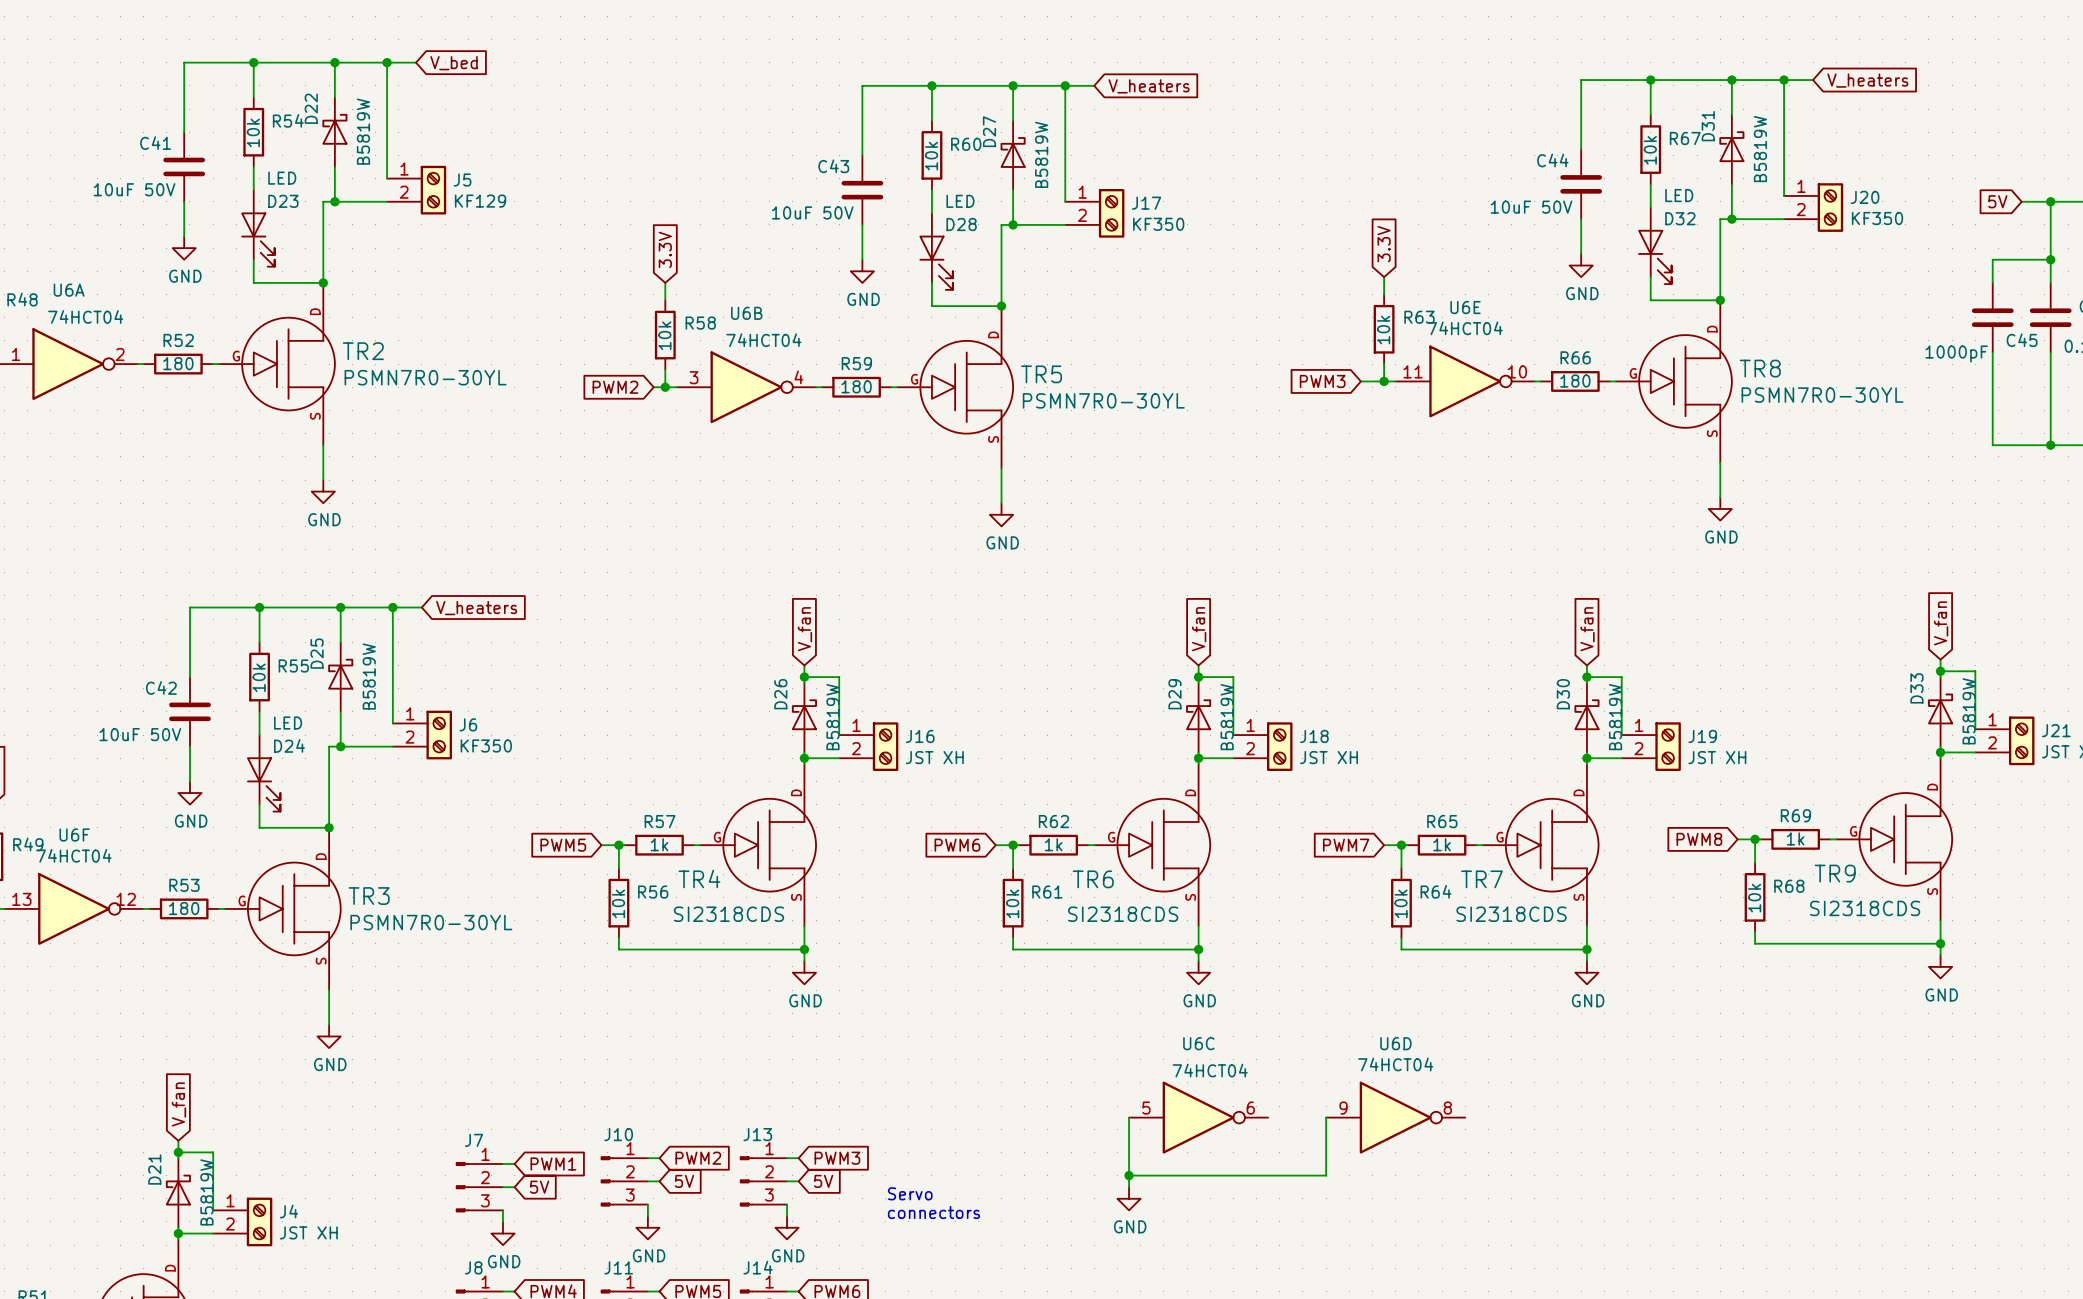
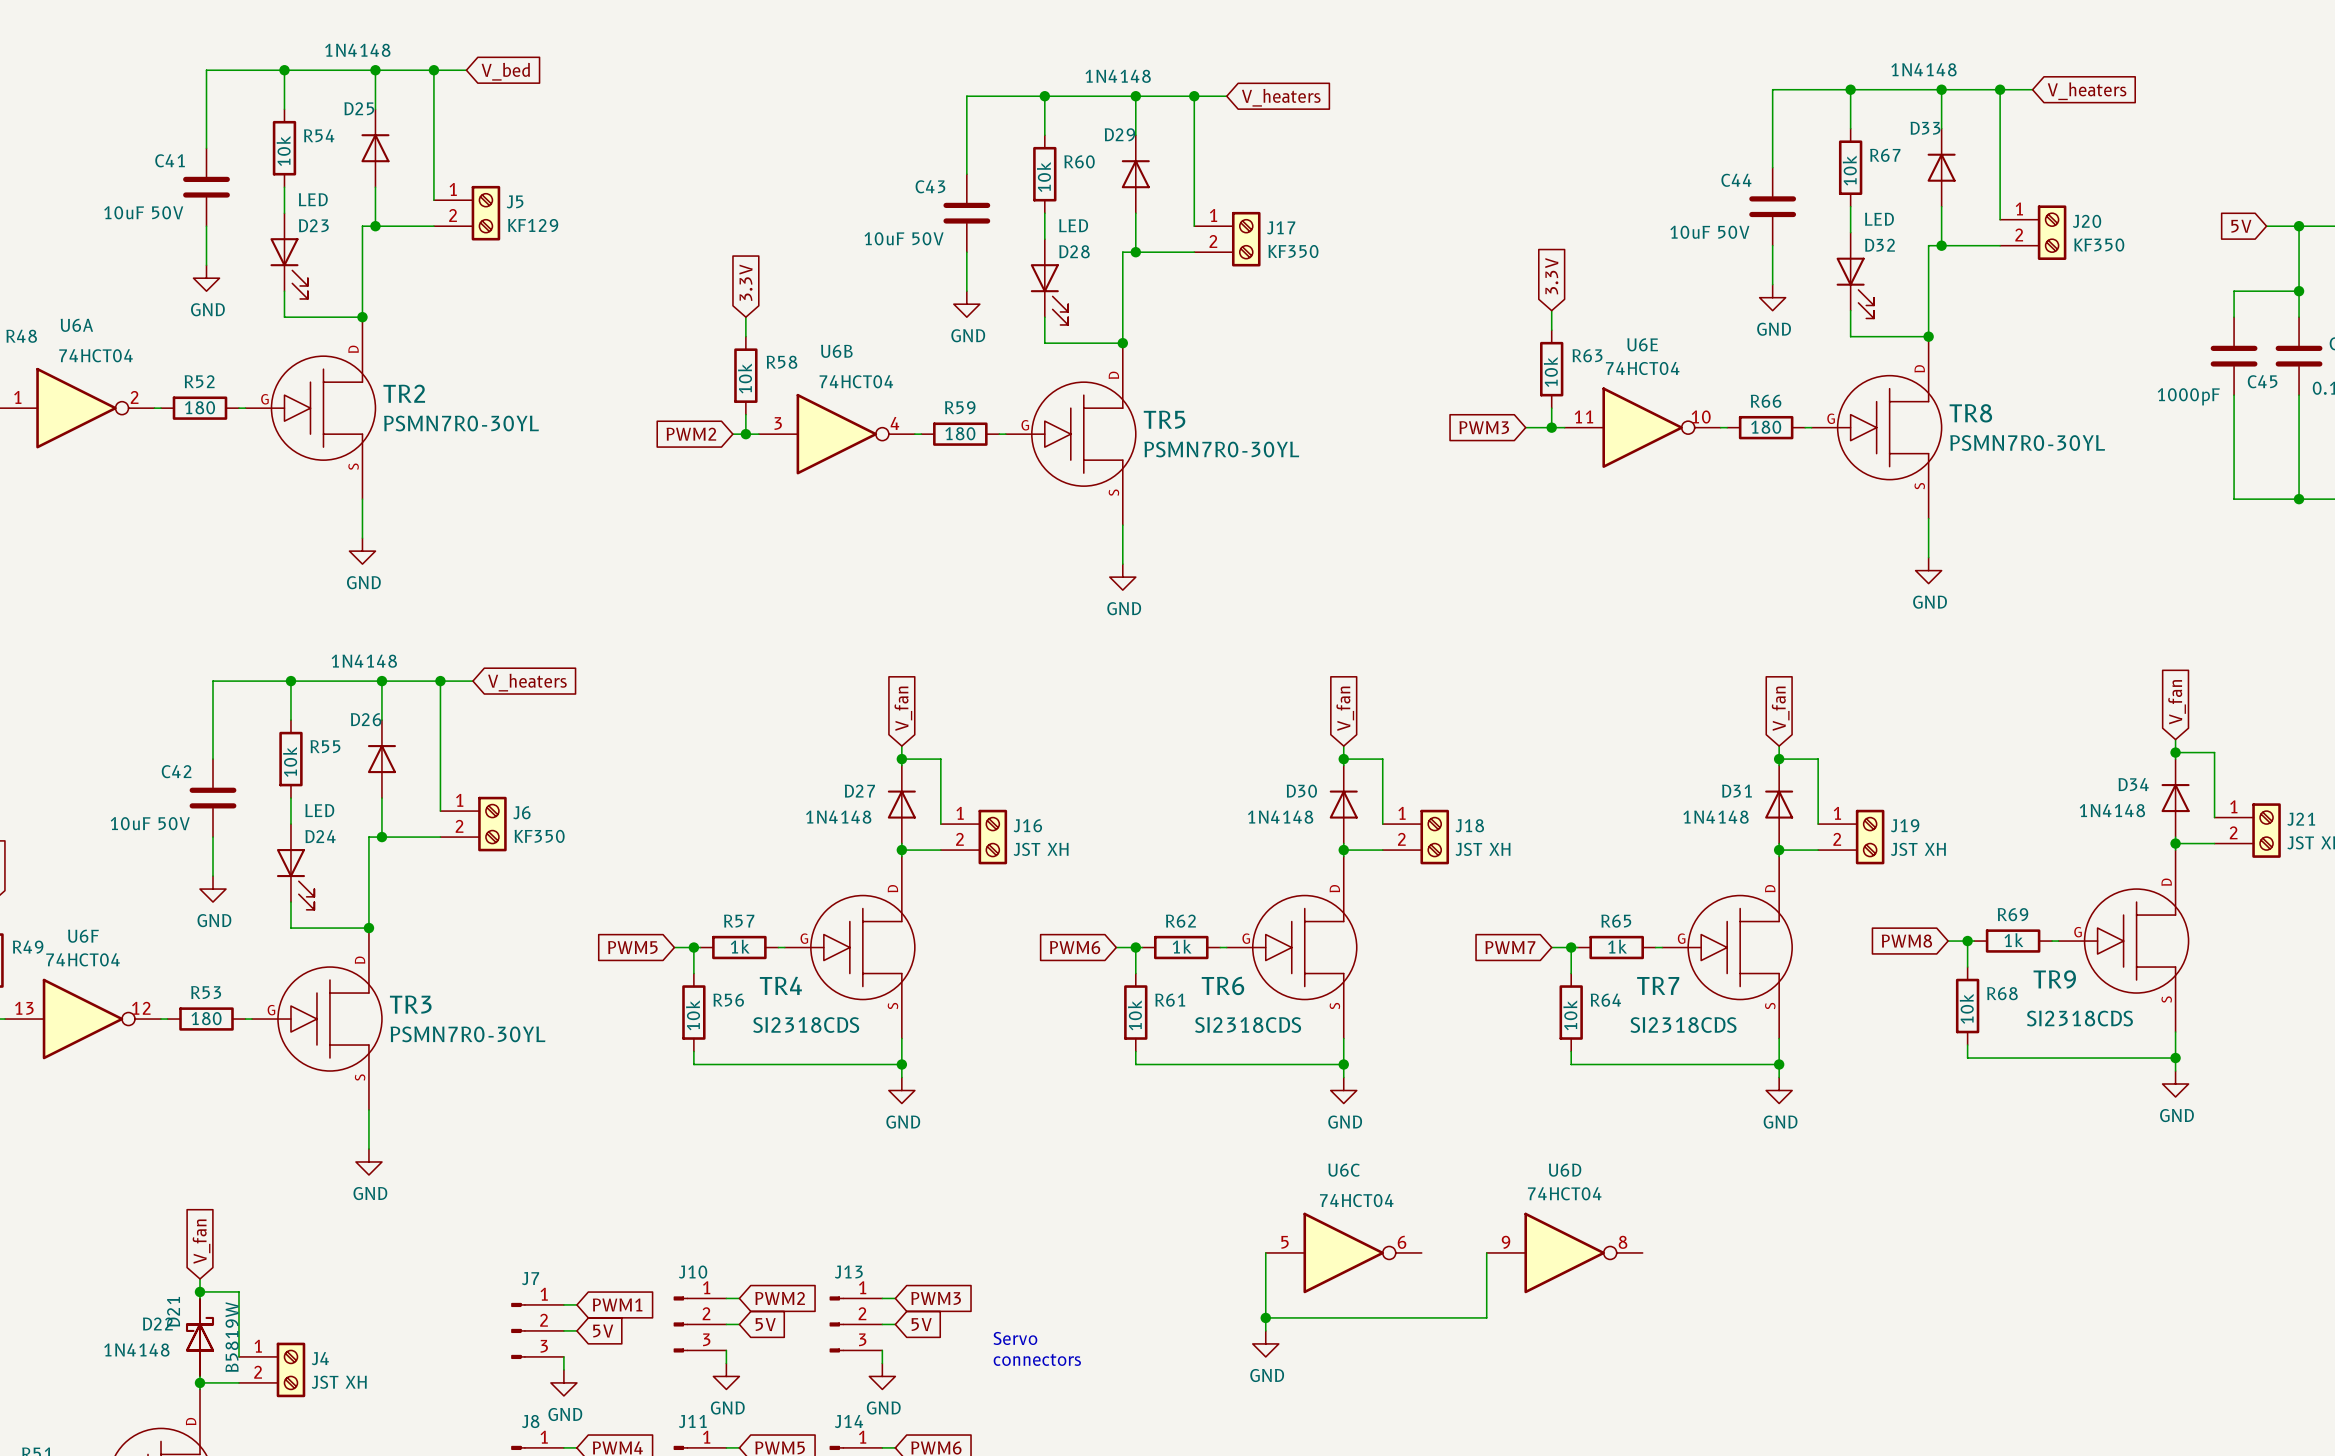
D22 symbol: [322, 97, 348, 167] -> [185, 1298, 215, 1377]
D31 symbol: [1719, 114, 1745, 185] -> [1765, 765, 1794, 844]
D27 symbol: [1000, 120, 1026, 191] -> [887, 765, 916, 844]
D22 value: B5819W (363, 131) -> 1N4148 (136, 1350)
D31 value: B5819W (1760, 149) -> 1N4148 (1716, 817)
D27 value: B5819W (1041, 154) -> 1N4148 (838, 817)
D25 symbol: [328, 642, 354, 712] -> [361, 109, 390, 188]
D25 name position: D25 (317, 653) -> D25 (359, 108)
D25 value: B5819W (369, 676) -> 1N4148 (357, 50)
D33 symbol: [1928, 677, 1954, 747] -> [1927, 128, 1956, 207]
D26 symbol: [791, 682, 817, 753] -> [367, 720, 397, 799]
D29 symbol: [1186, 682, 1212, 753] -> [1121, 135, 1150, 214]
D30 symbol: [1574, 682, 1600, 753] -> [1329, 765, 1358, 844]
D33 name position: D33 (1916, 688) -> D33 (1925, 128)
D26 name position: D26 (780, 694) -> D26 (366, 719)
D29 name position: D29 (1174, 694) -> D29 (1119, 134)
D34: none -> 1N4148 (2175, 798)
D33 value: B5819W (1969, 711) -> 1N4148 (1923, 69)
D26 value: B5819W (832, 717) -> 1N4148 (364, 661)
D29 value: B5819W (1227, 717) -> 1N4148 (1118, 76)
D30 value: B5819W (1615, 717) -> 1N4148 (1280, 817)

